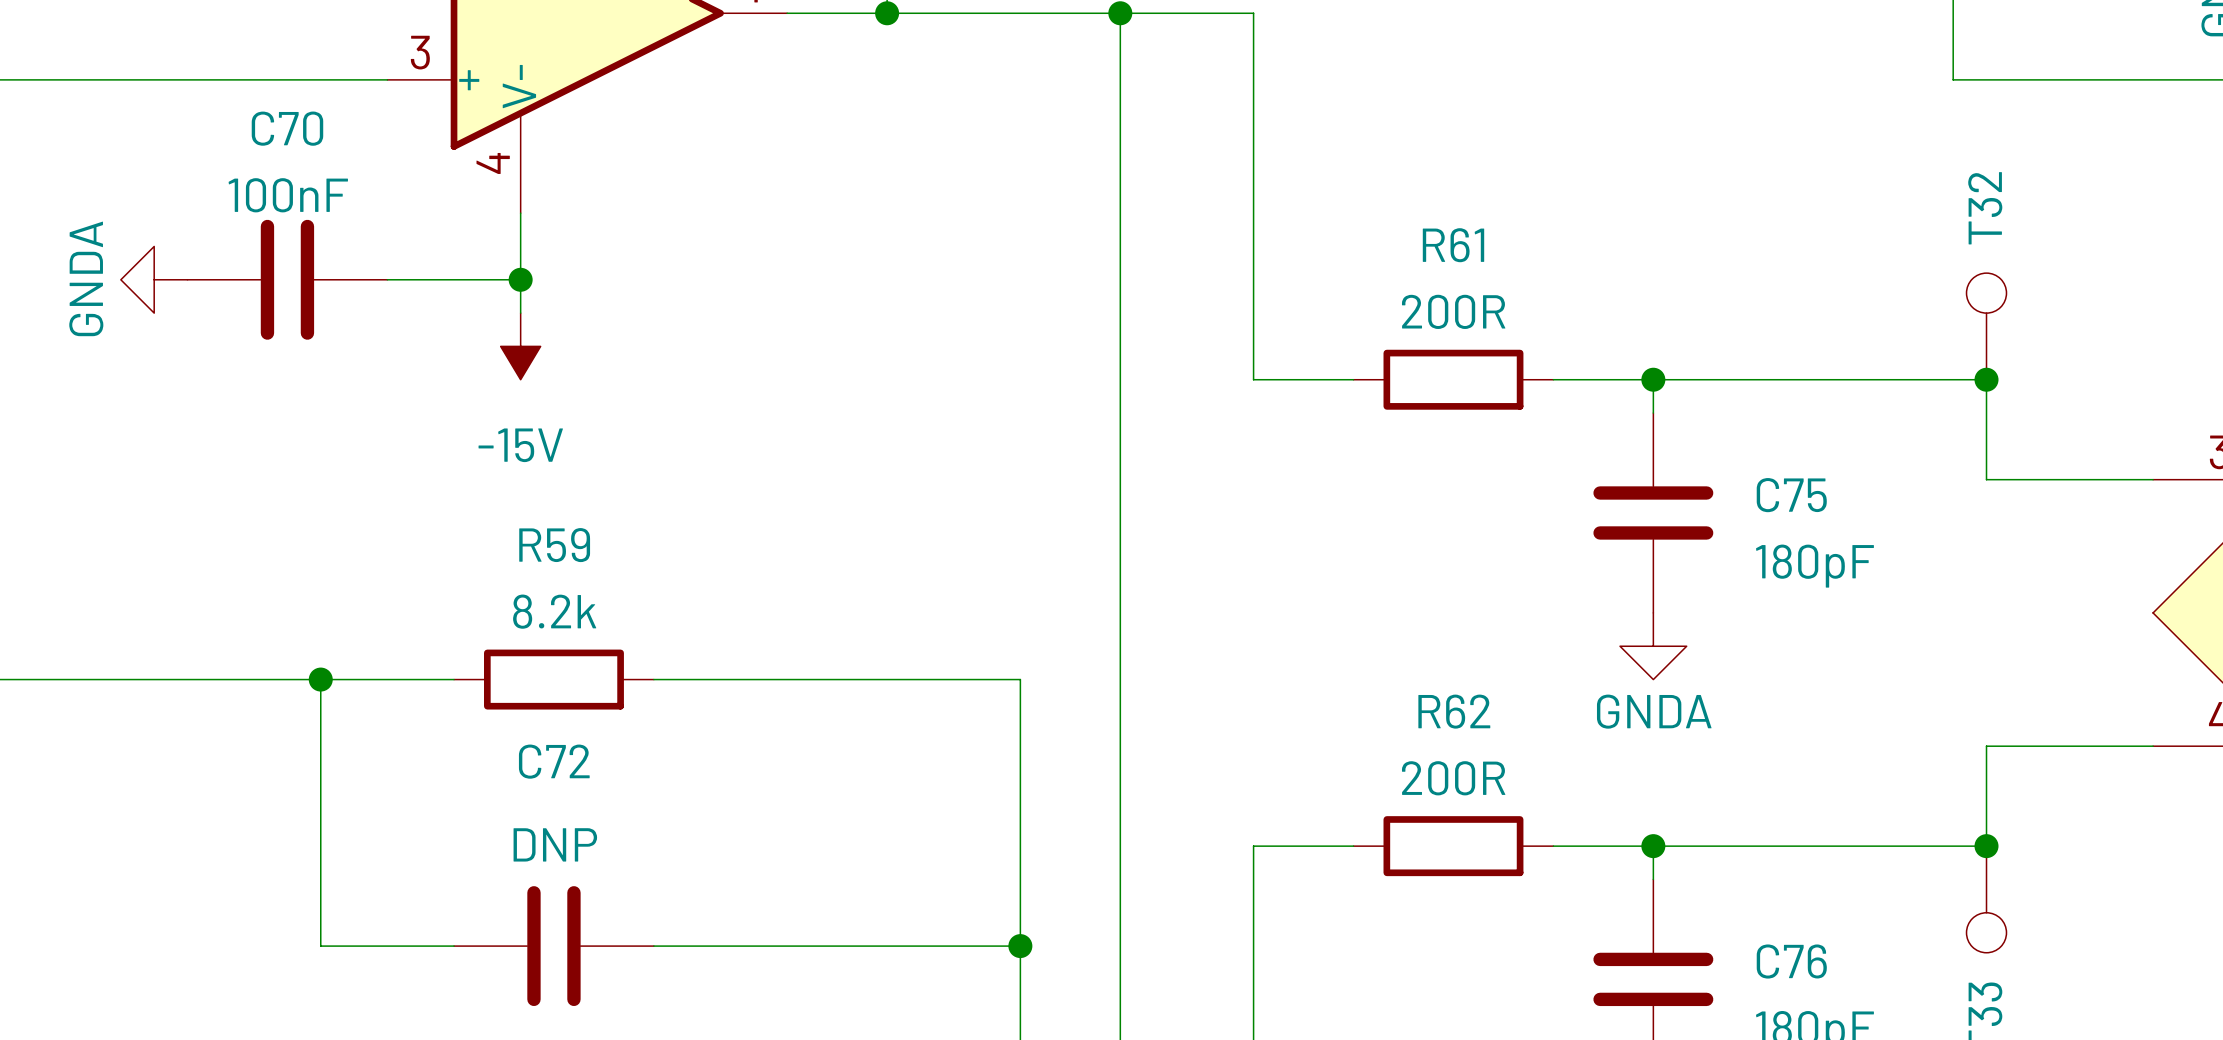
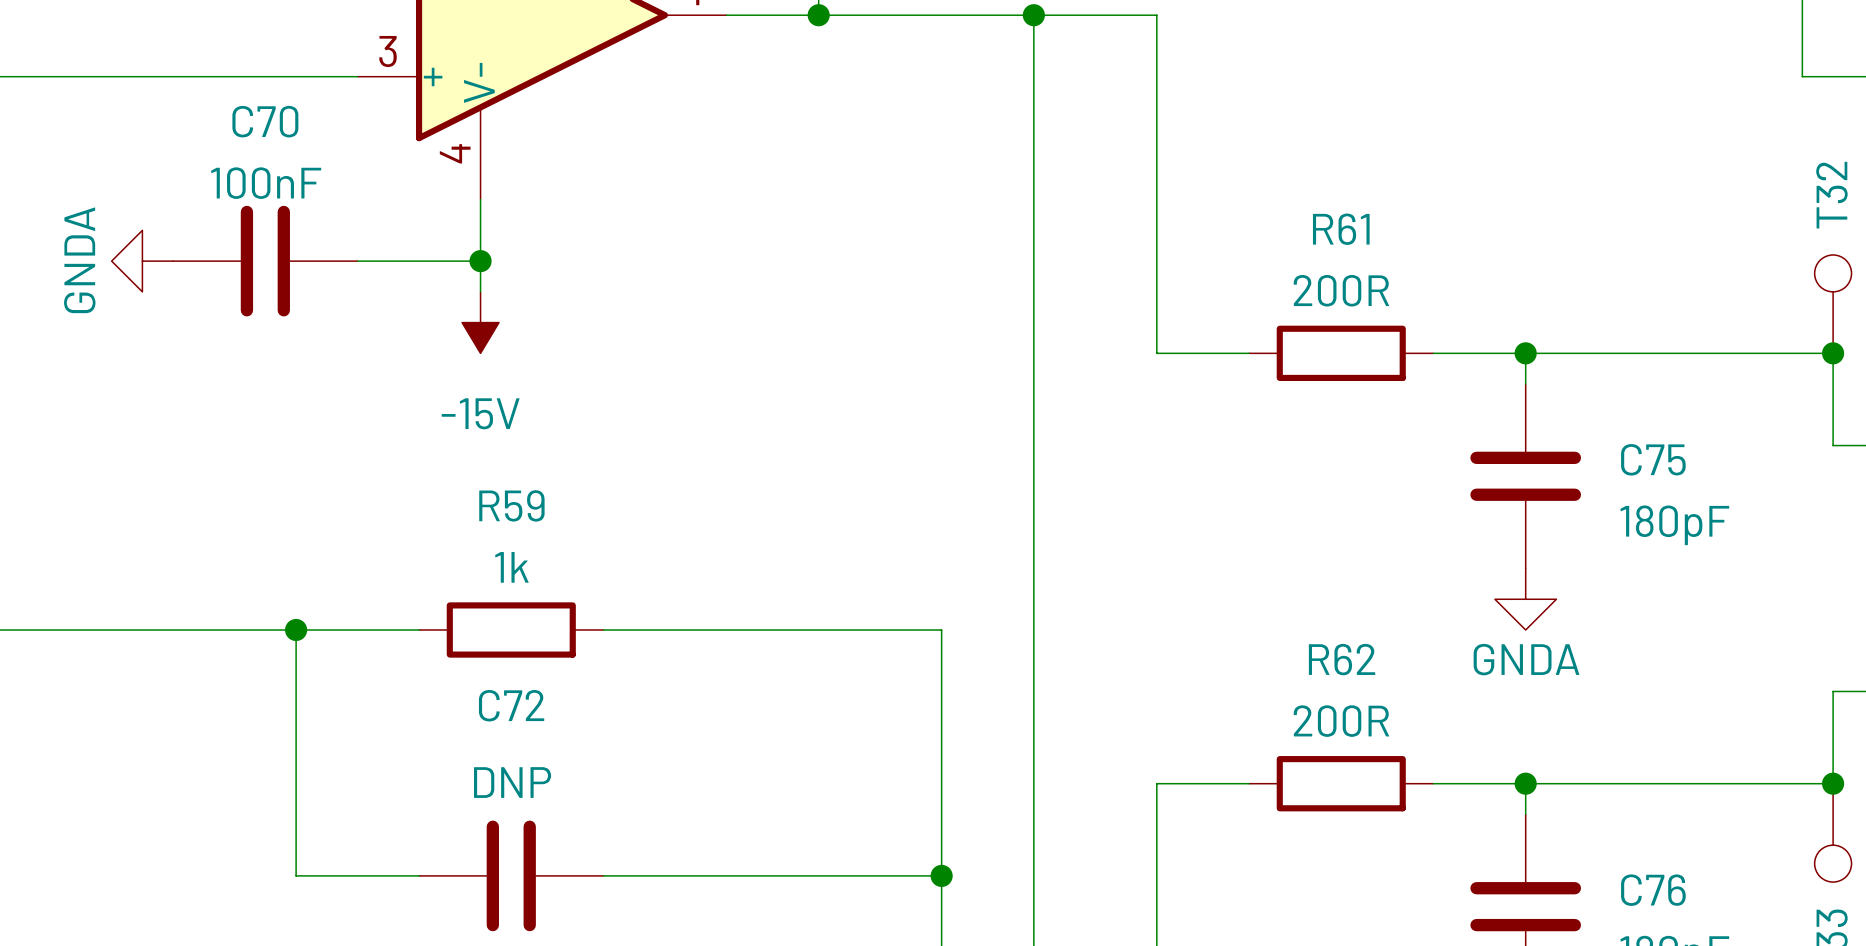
R59 value: 8.2k (554, 611) -> 1k (511, 567)

